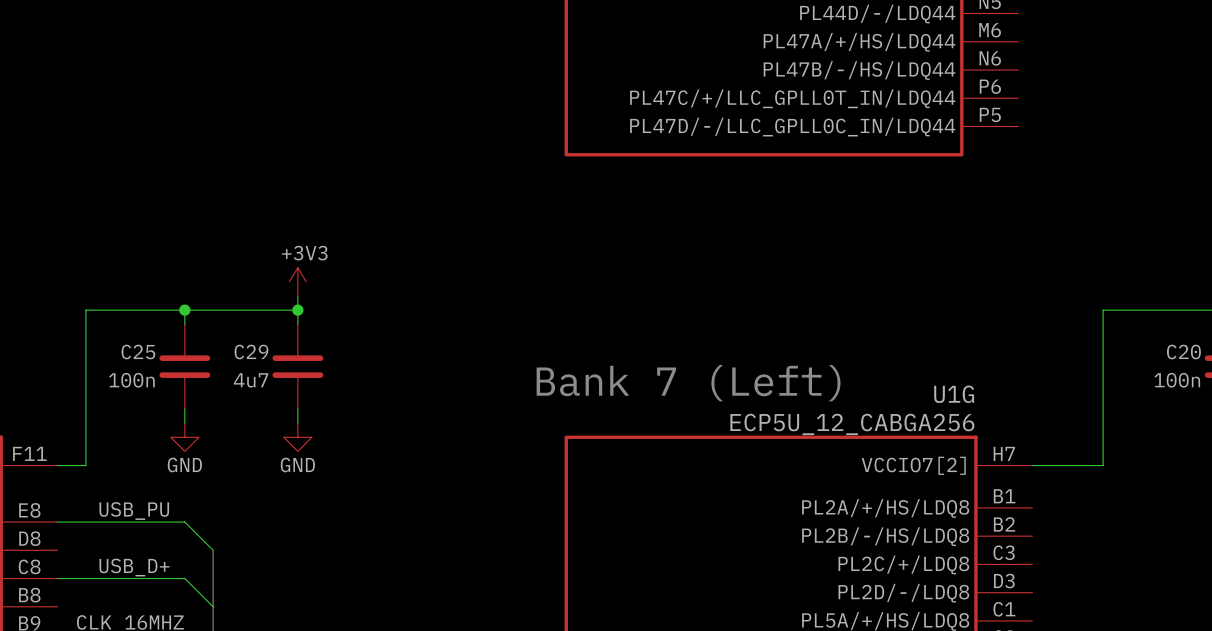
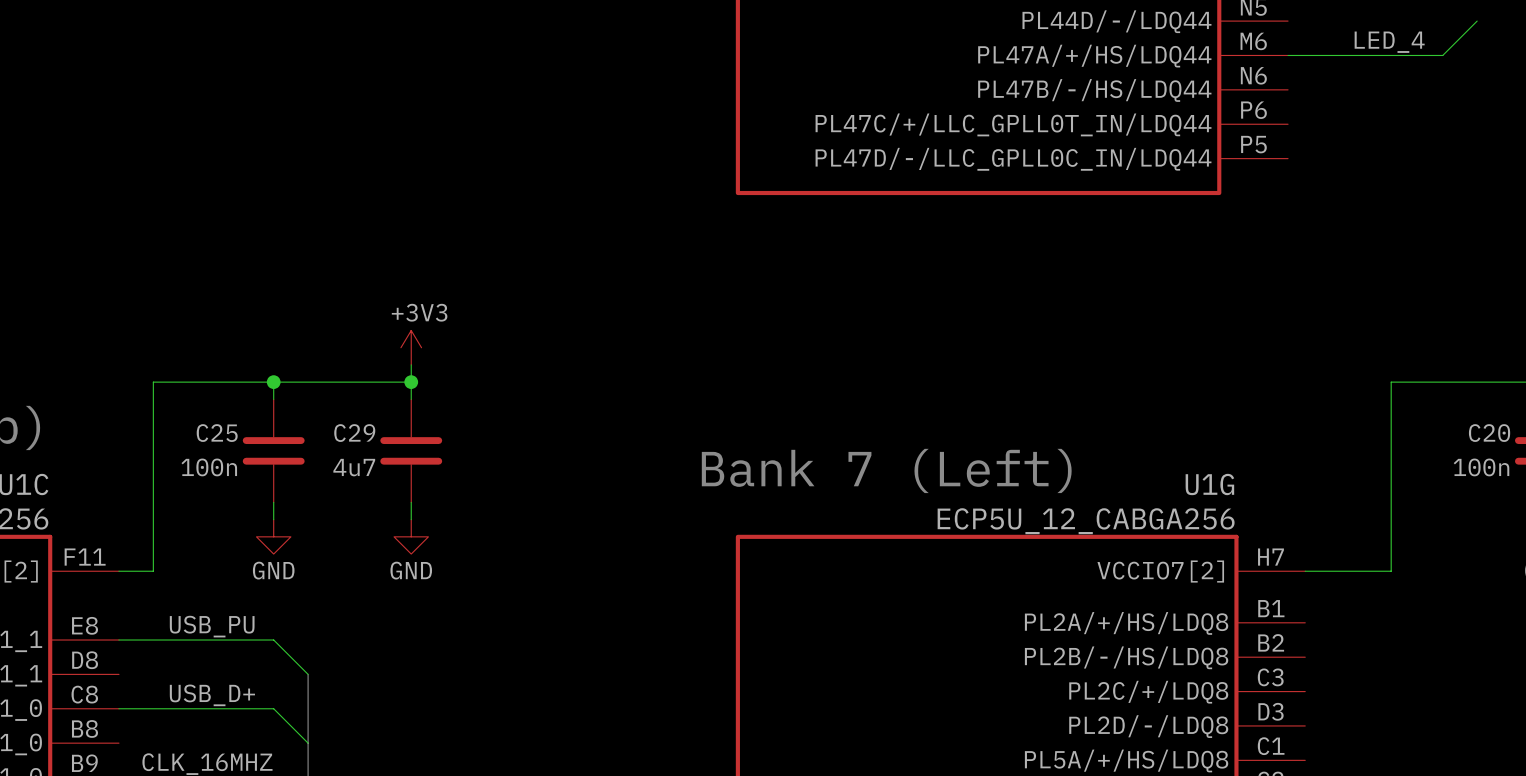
wire: none -> (1477, 21) (1442, 55) (1288, 55)
label: none -> LED_4 (1389, 42)

